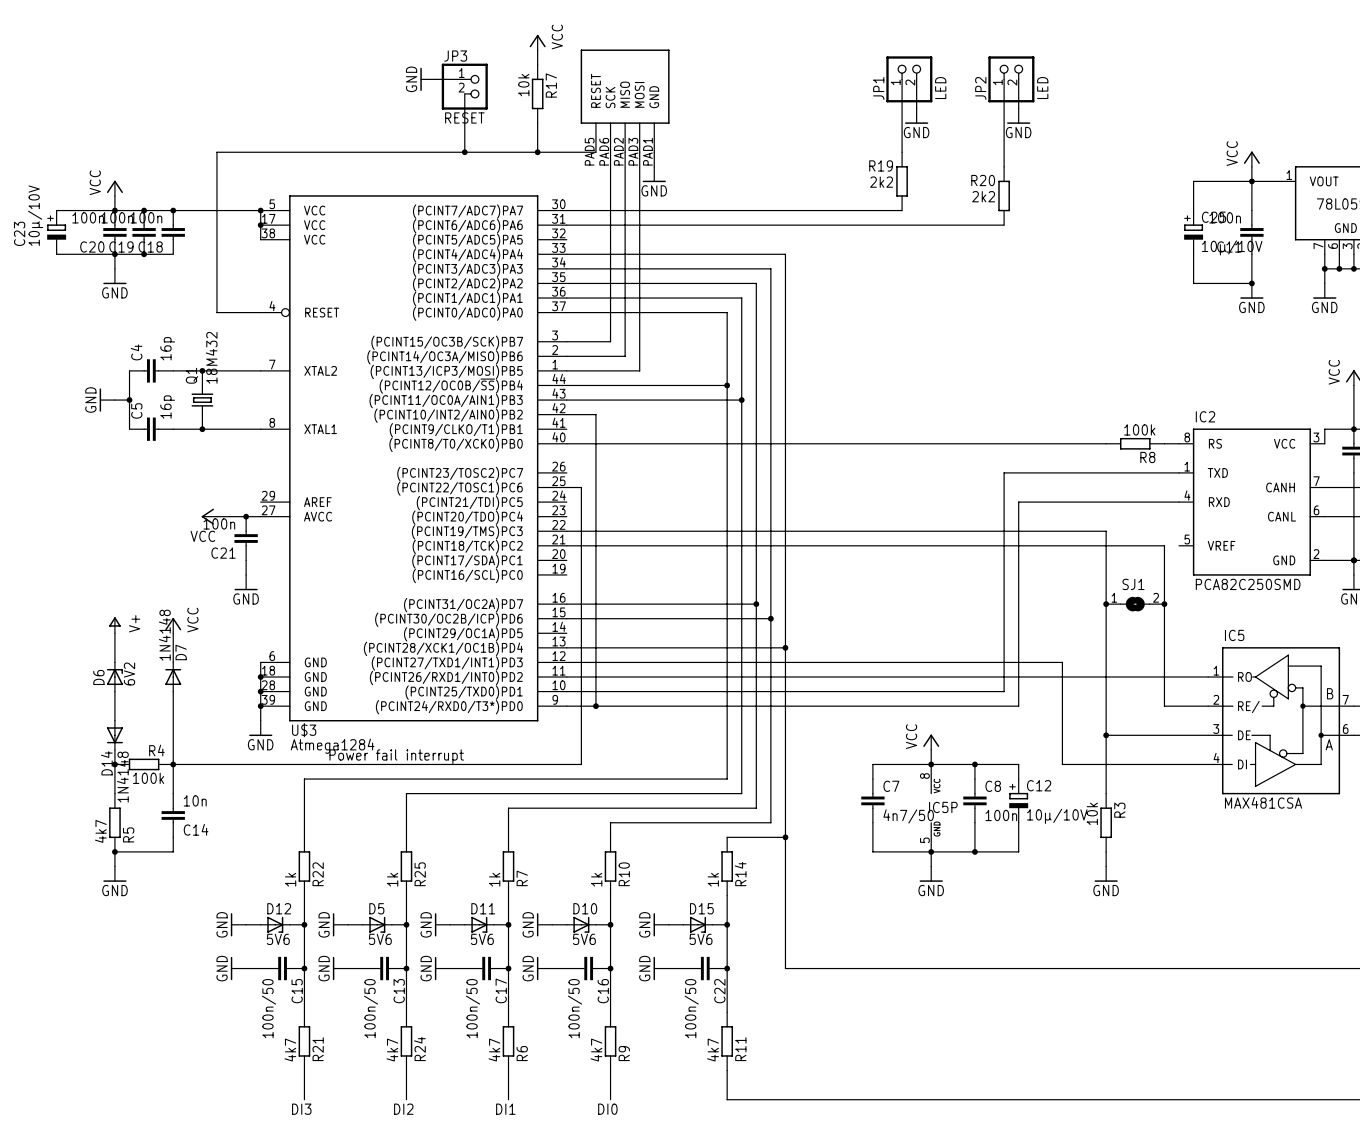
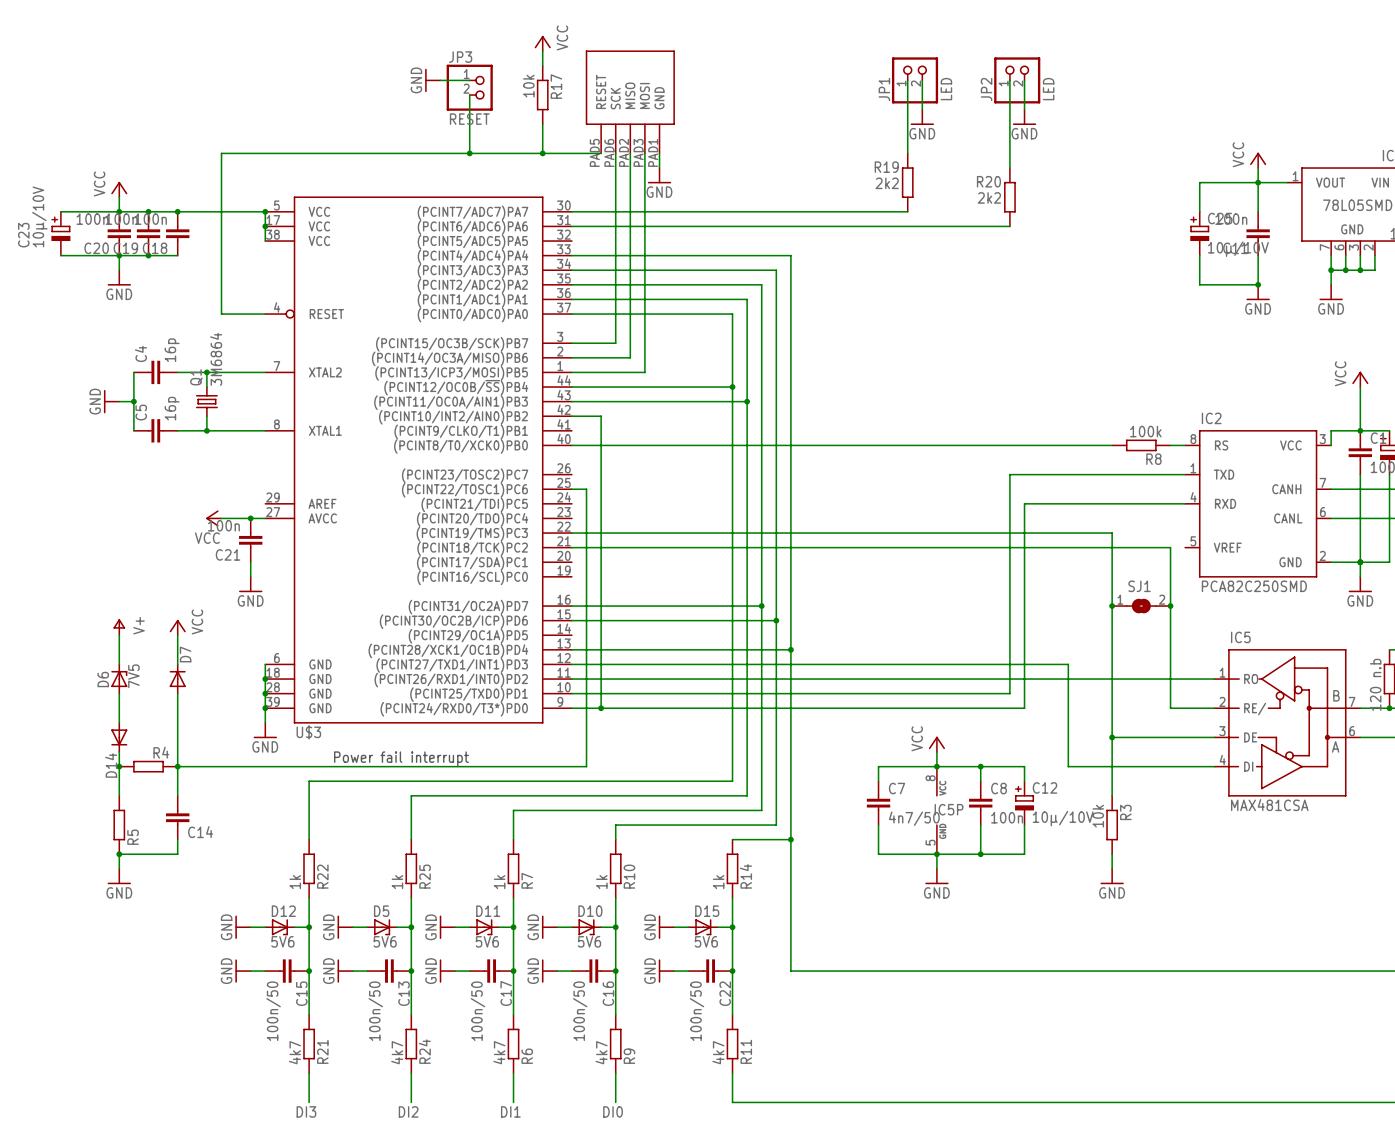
Q1 value: 18M432 (211, 357) -> 3M6864 (216, 359)
D7 value: 1N4148 (164, 635) -> none
D6 value: 6V2 (129, 673) -> 7V5 (133, 676)
U$3 value: Atmega1284 (332, 746) -> none
D14 value: 1N4148 (122, 777) -> none
R4 value: 100k (148, 778) -> none
C14 value: 10n (195, 800) -> none
R5 value: 4k7 (100, 831) -> none

